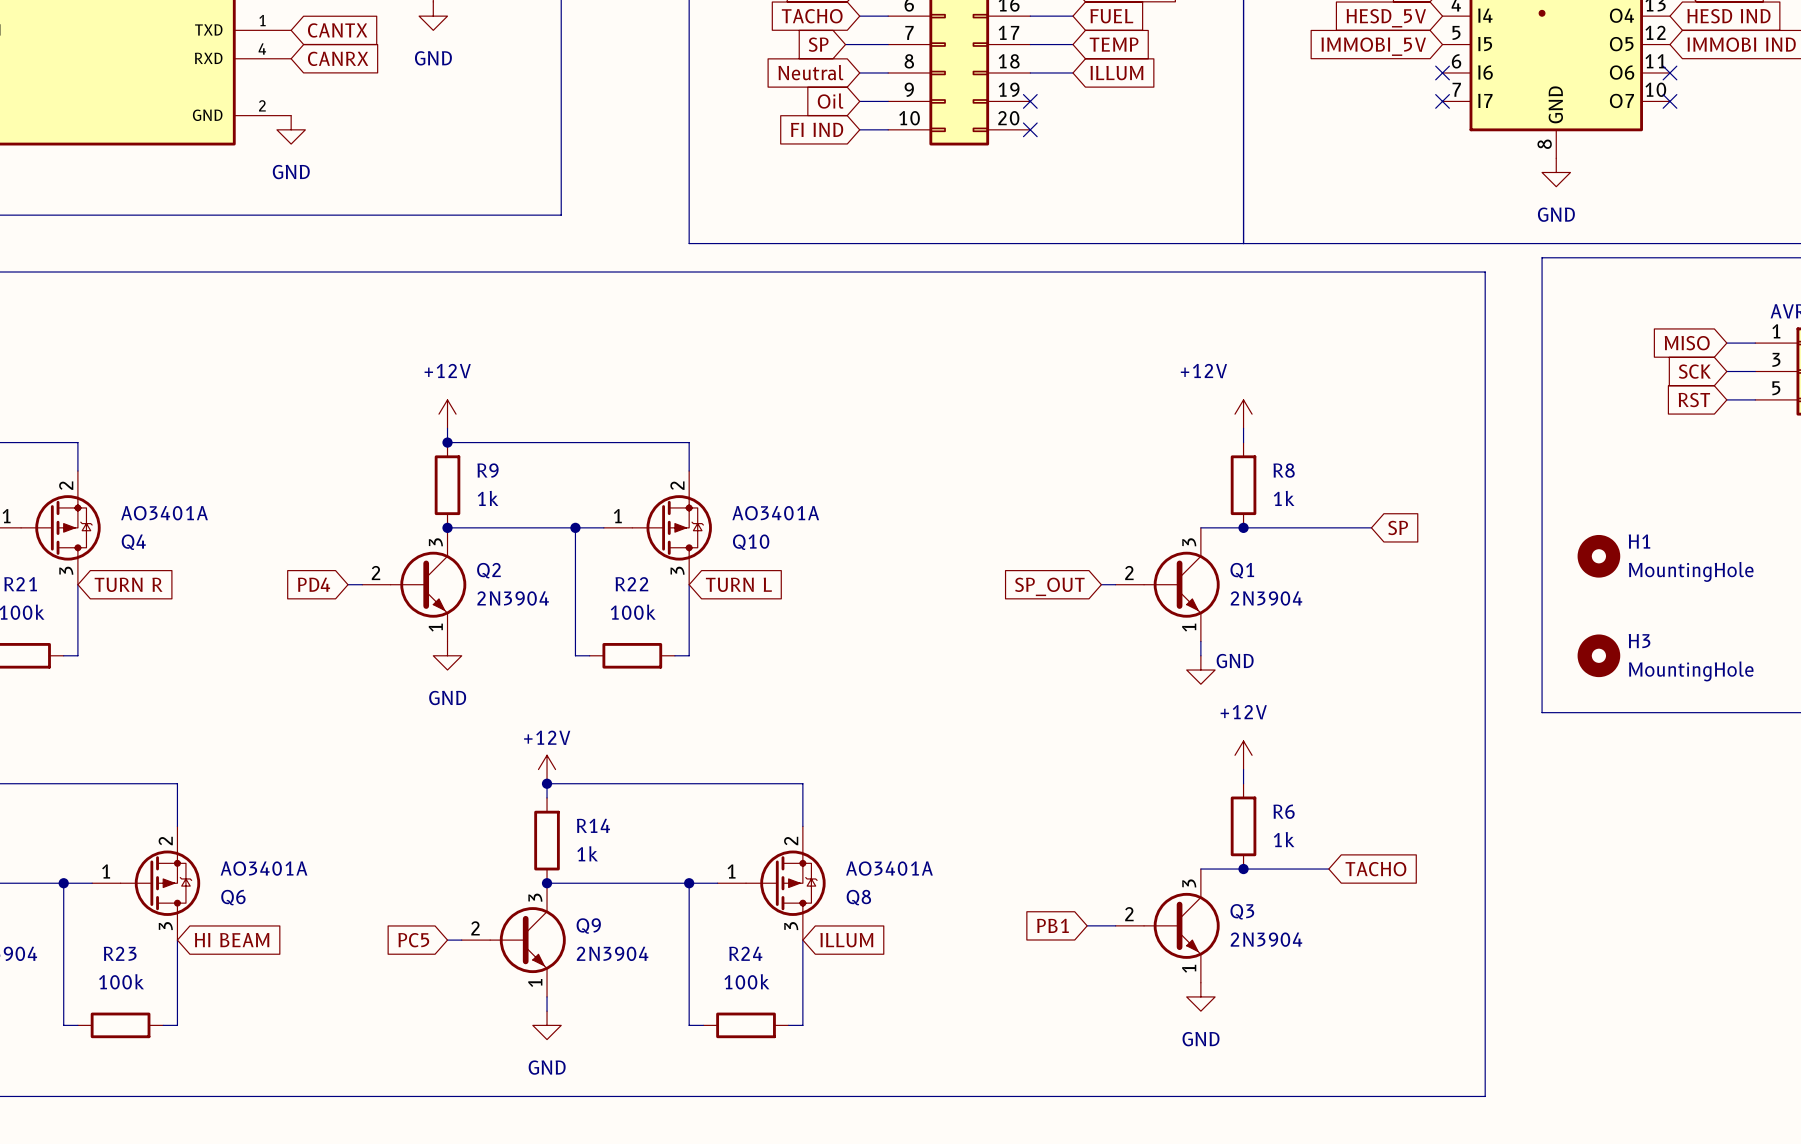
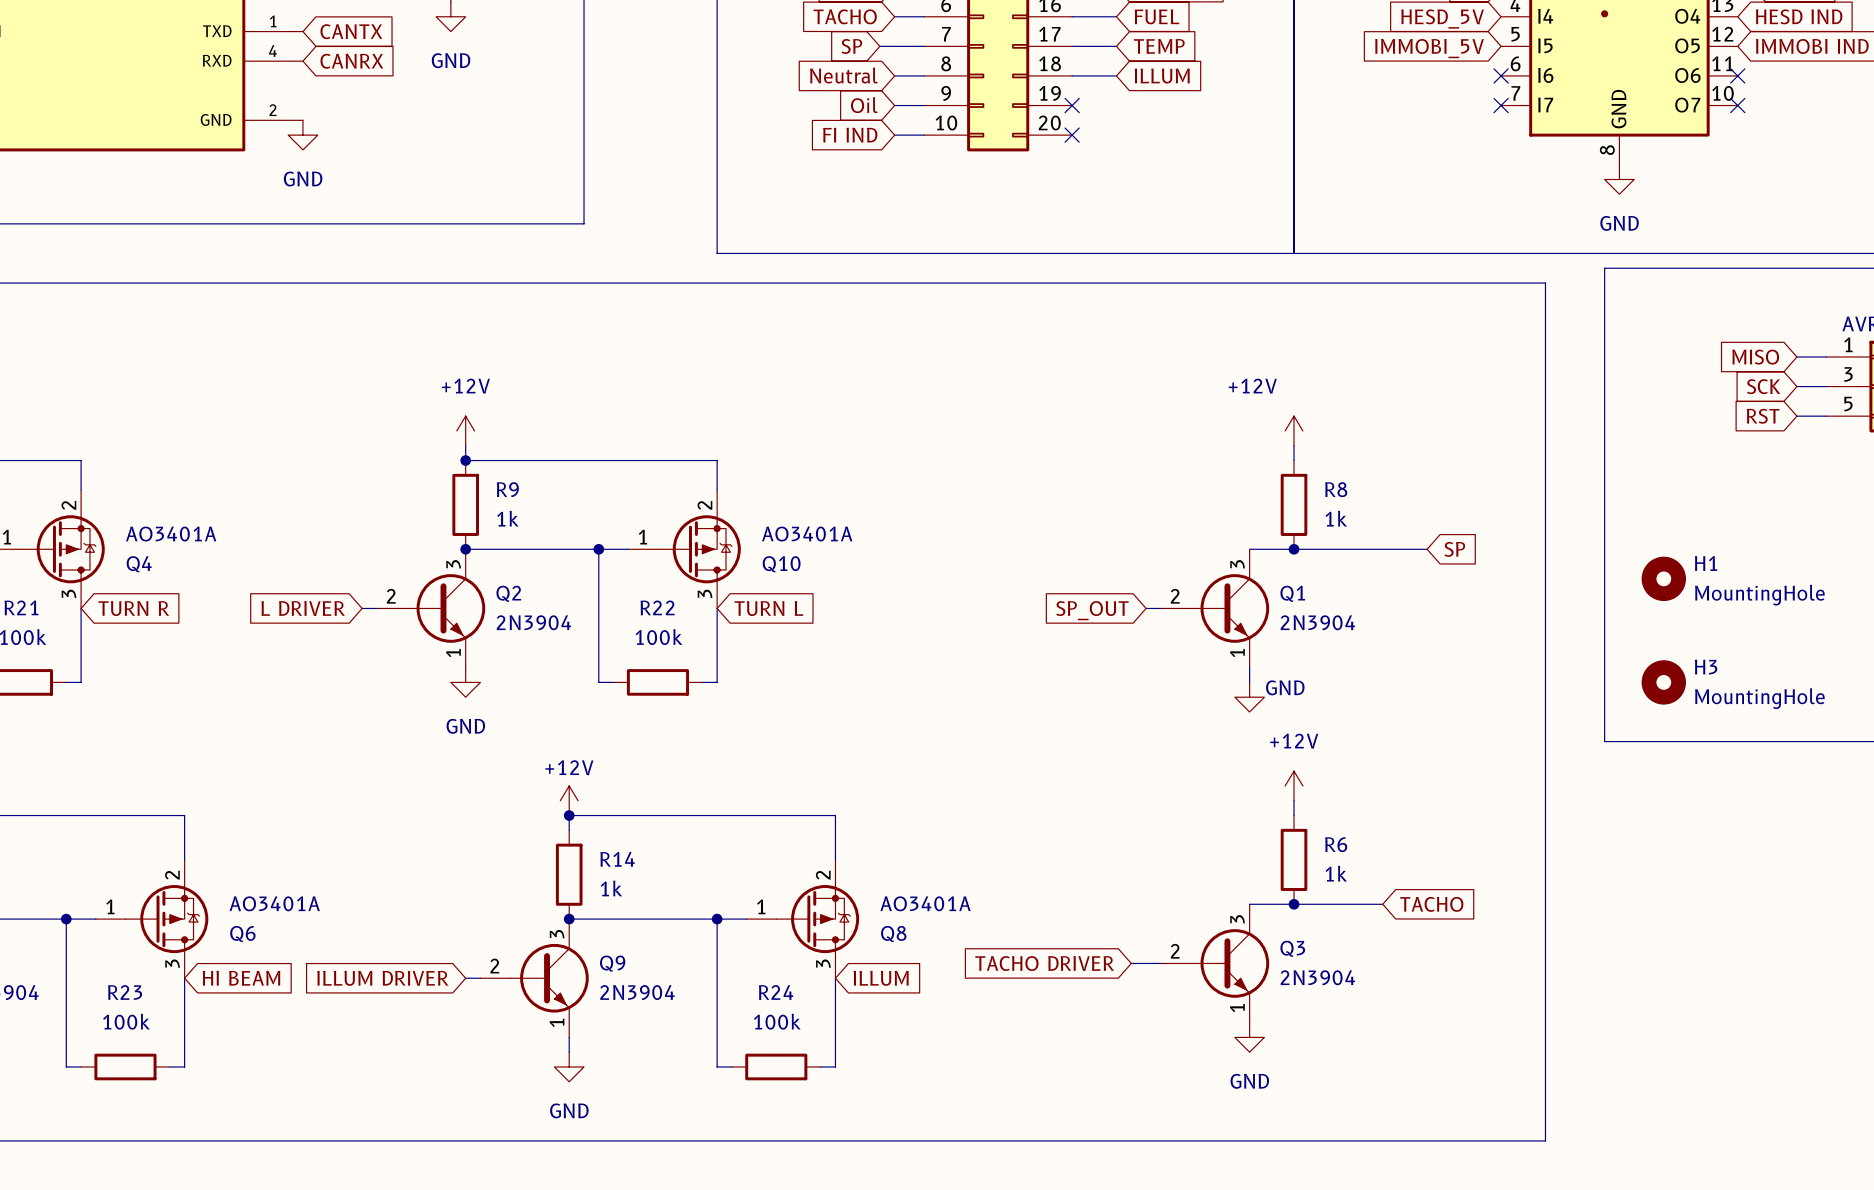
global label: PD4 (314, 584) -> L DRIVER (303, 608)
global label: PB1 (1052, 925) -> TACHO DRIVER (1044, 963)
global label: PC5 (413, 940) -> ILLUM DRIVER (382, 978)

